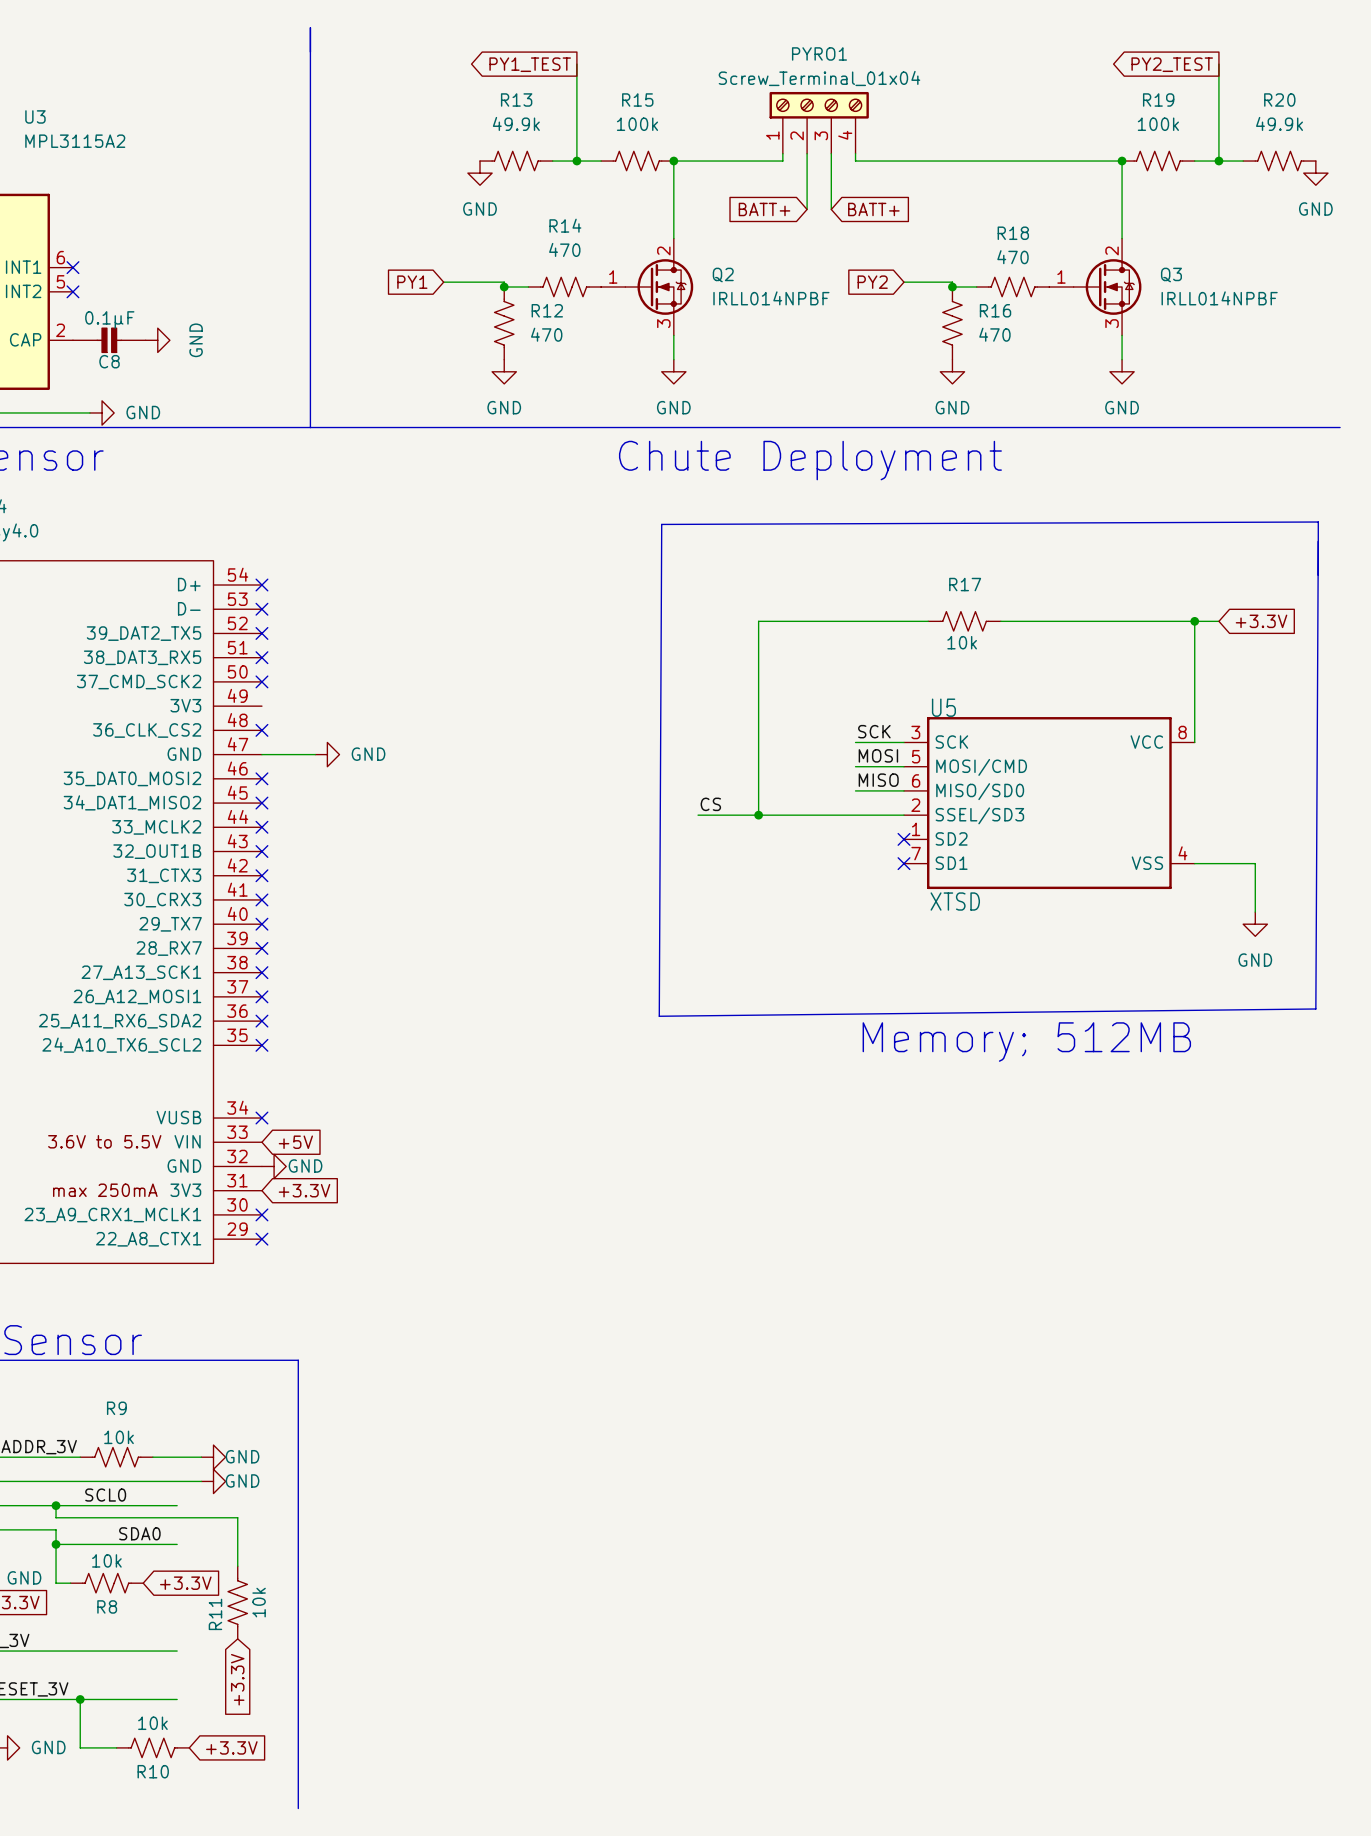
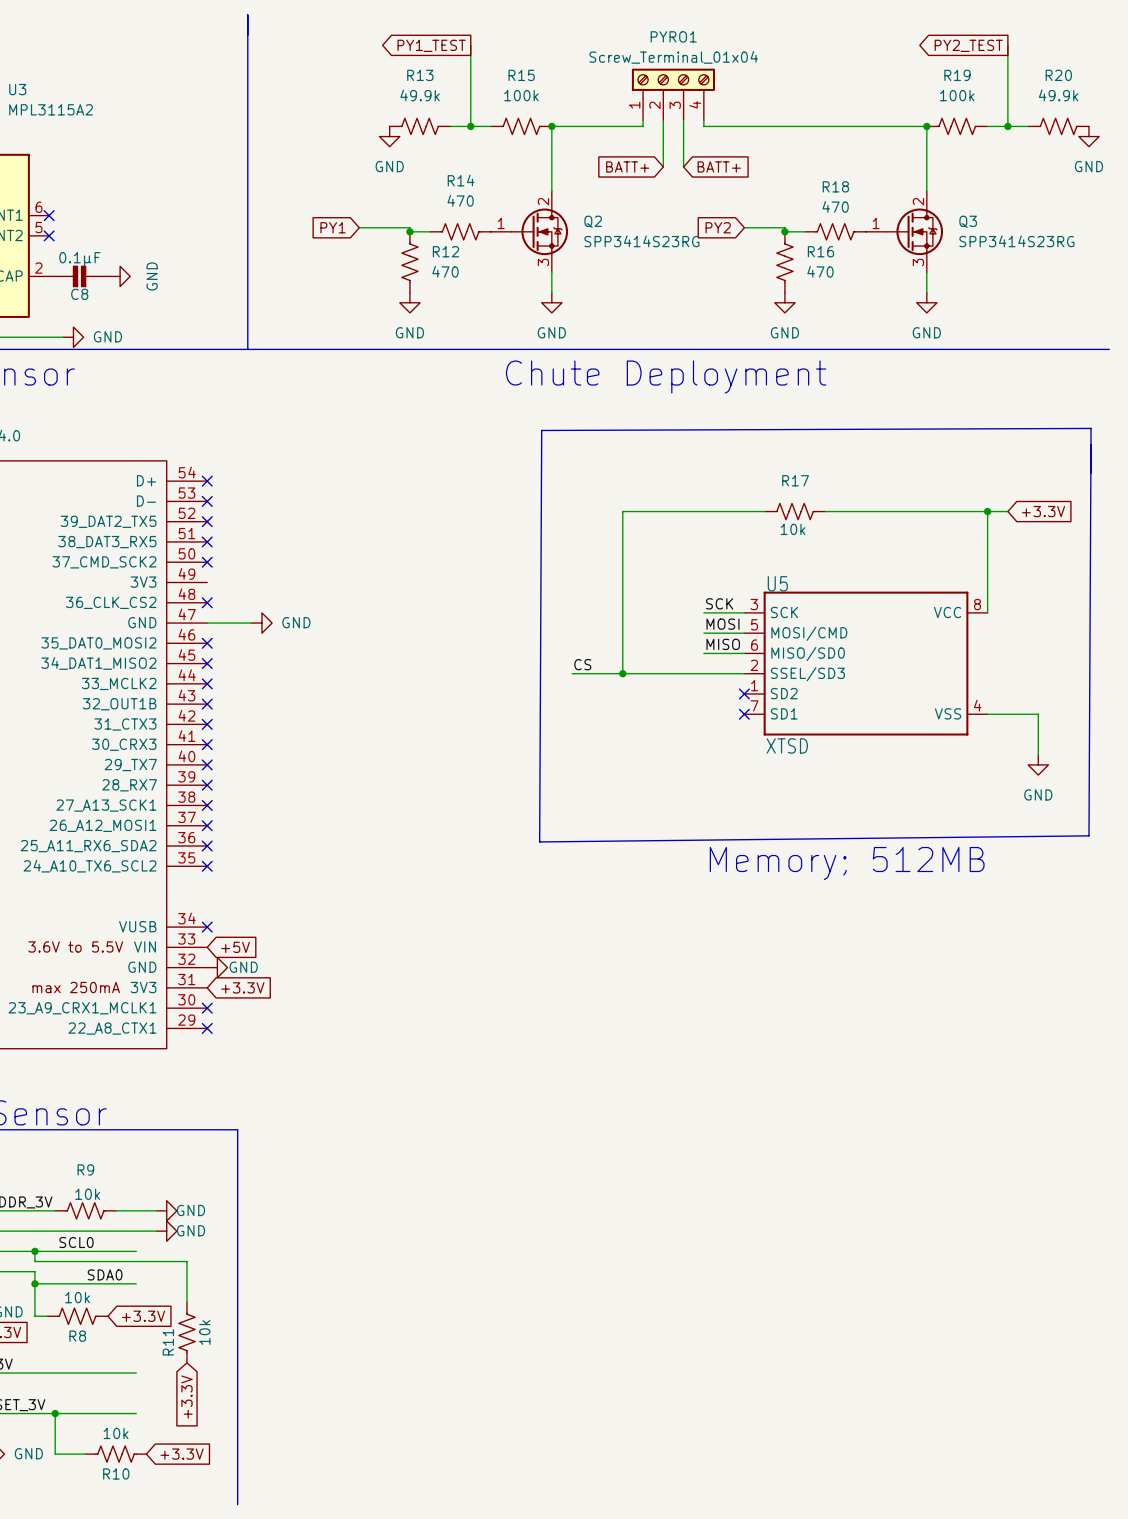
Q2 value: IRLL014NPBF (771, 298) -> SPP3414S23RG (641, 241)
Q3 value: IRLL014NPBF (1219, 298) -> SPP3414S23RG (1016, 241)

